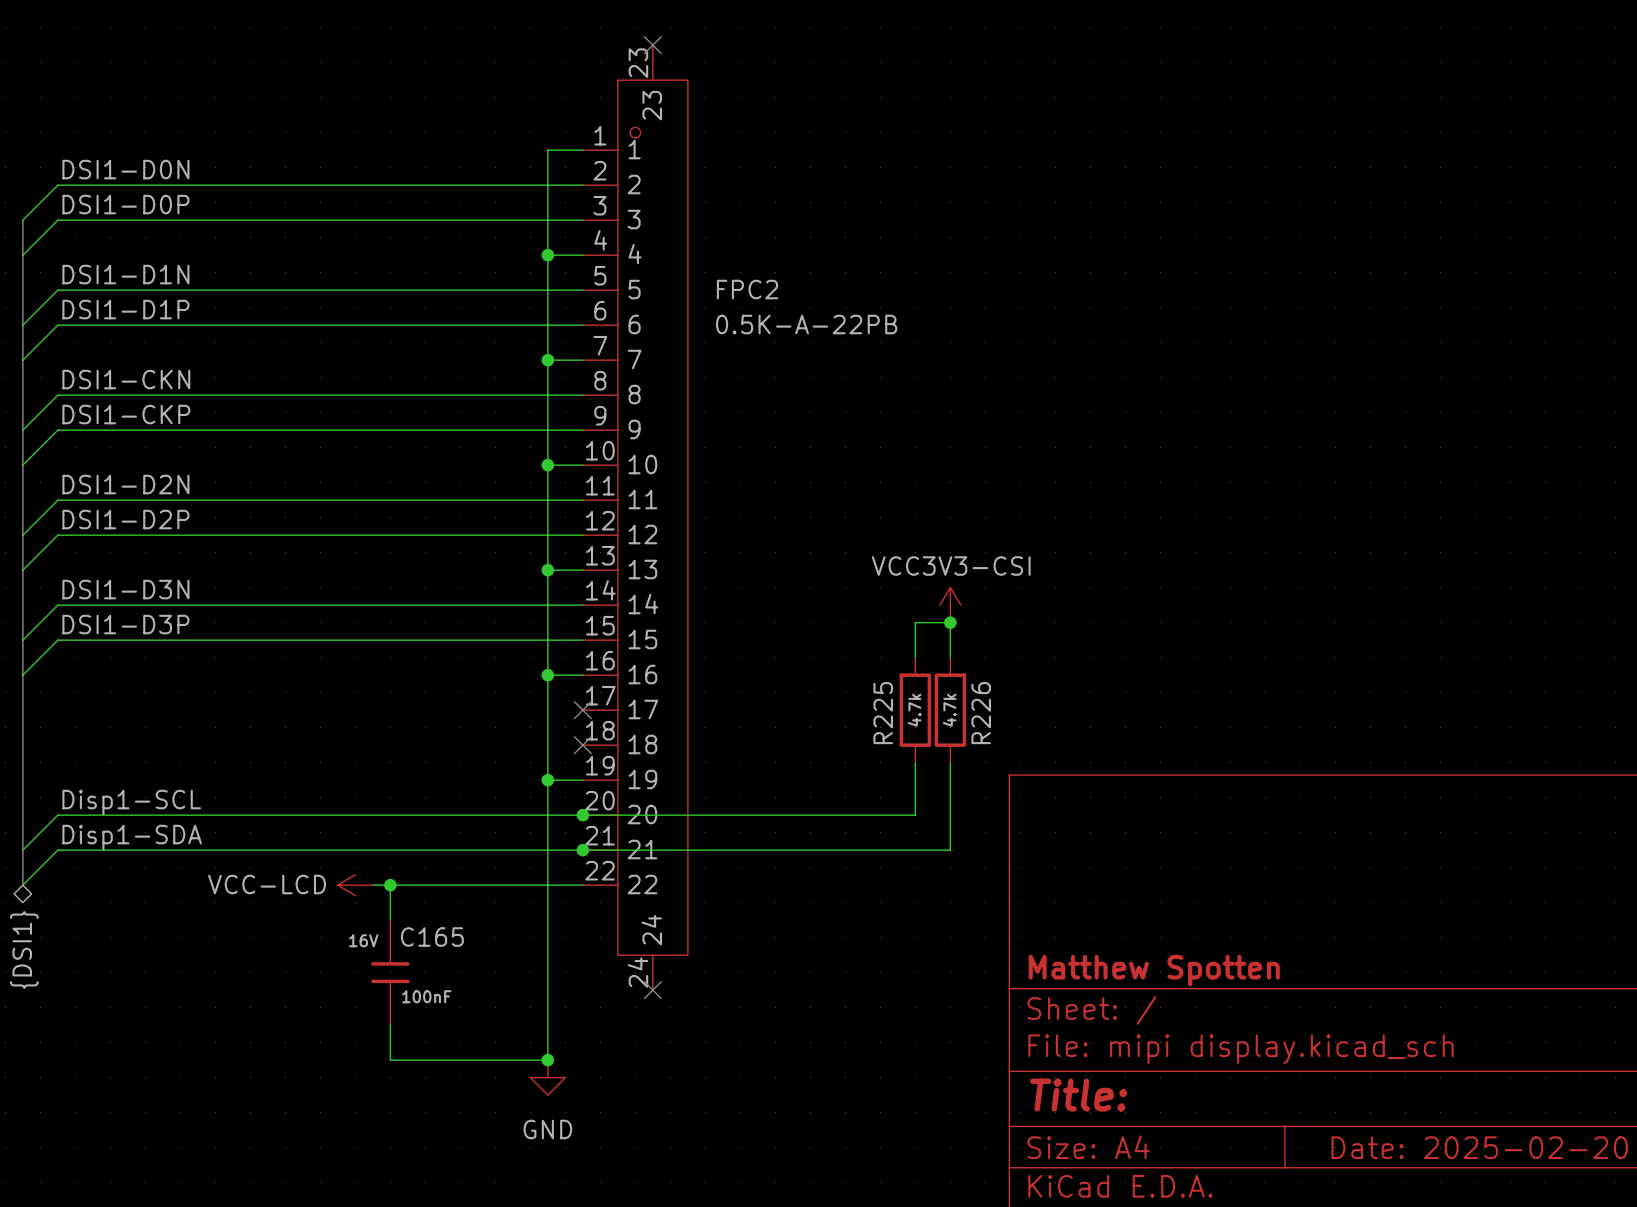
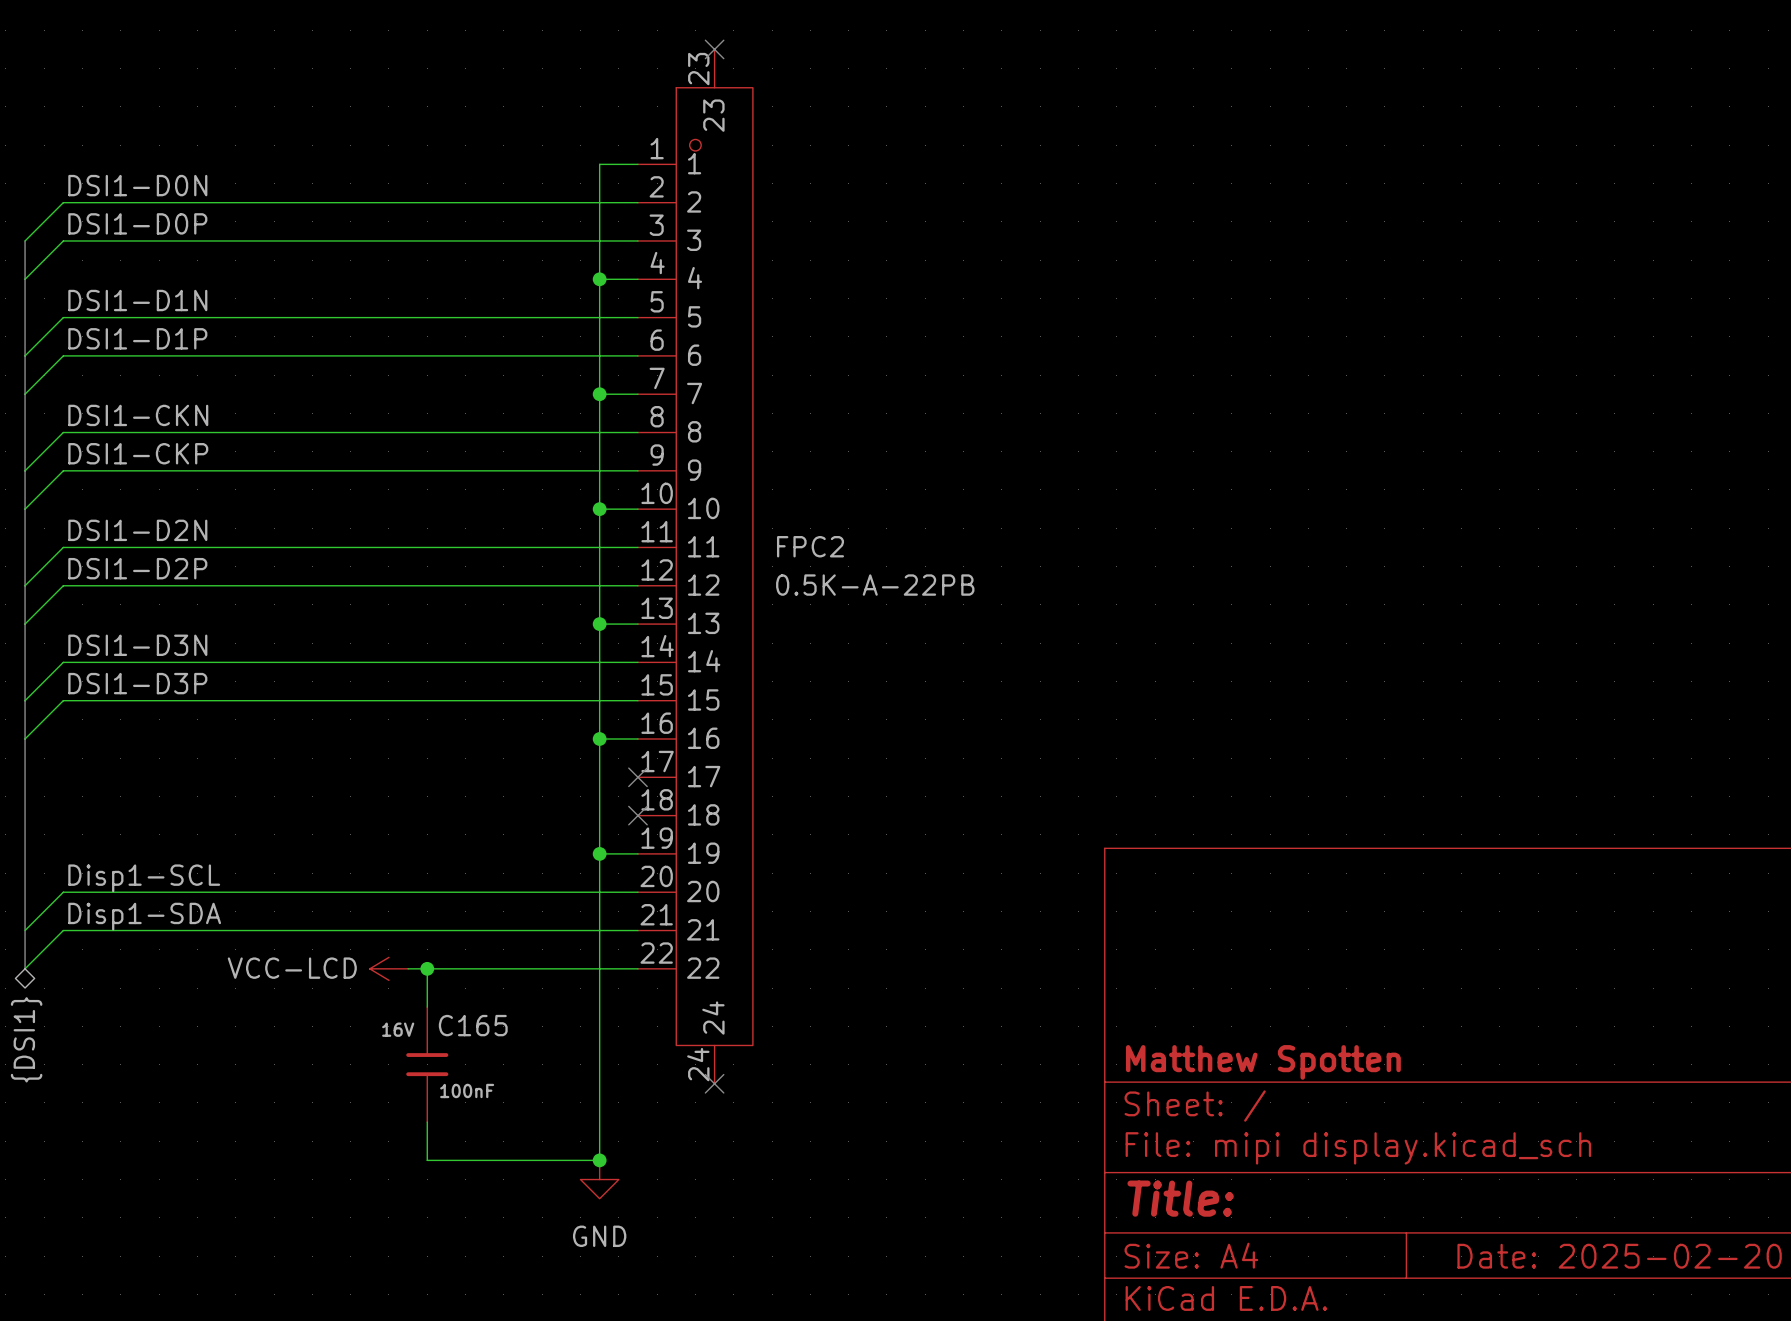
FPC2 name position: FPC2 (747, 289) -> FPC2 (810, 546)
FPC2 value position: 0.5K-A-22PB (806, 324) -> 0.5K-A-22PB (875, 585)
power symbol: VCC3V3-CSI (950, 605) -> none
junction: (950, 622) -> none
wire: (915, 657) (915, 622) (950, 622) (950, 657) -> none
R225: 4.7k (915, 710) -> none
R226: 4.7k (950, 710) -> none
wire: (915, 762) (915, 815) (582, 815) -> none
wire: (950, 762) (950, 850) (582, 850) -> none
junction: (582, 815) -> none
junction: (582, 850) -> none

